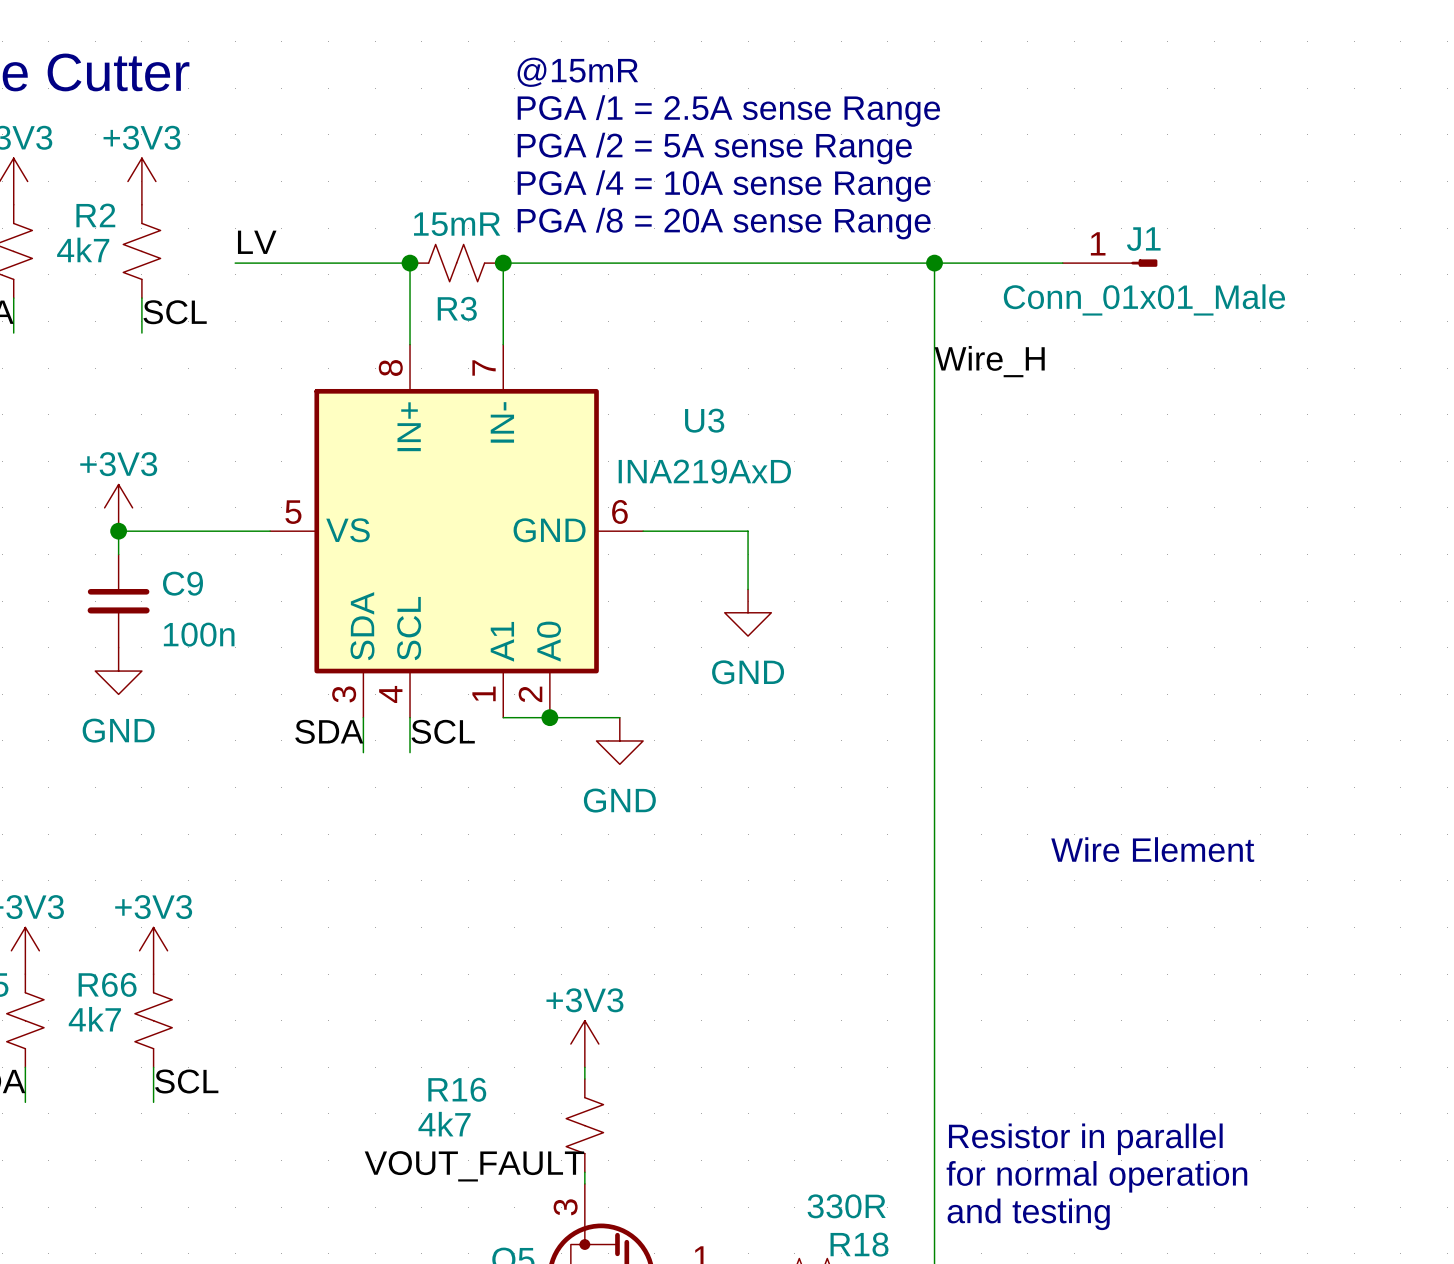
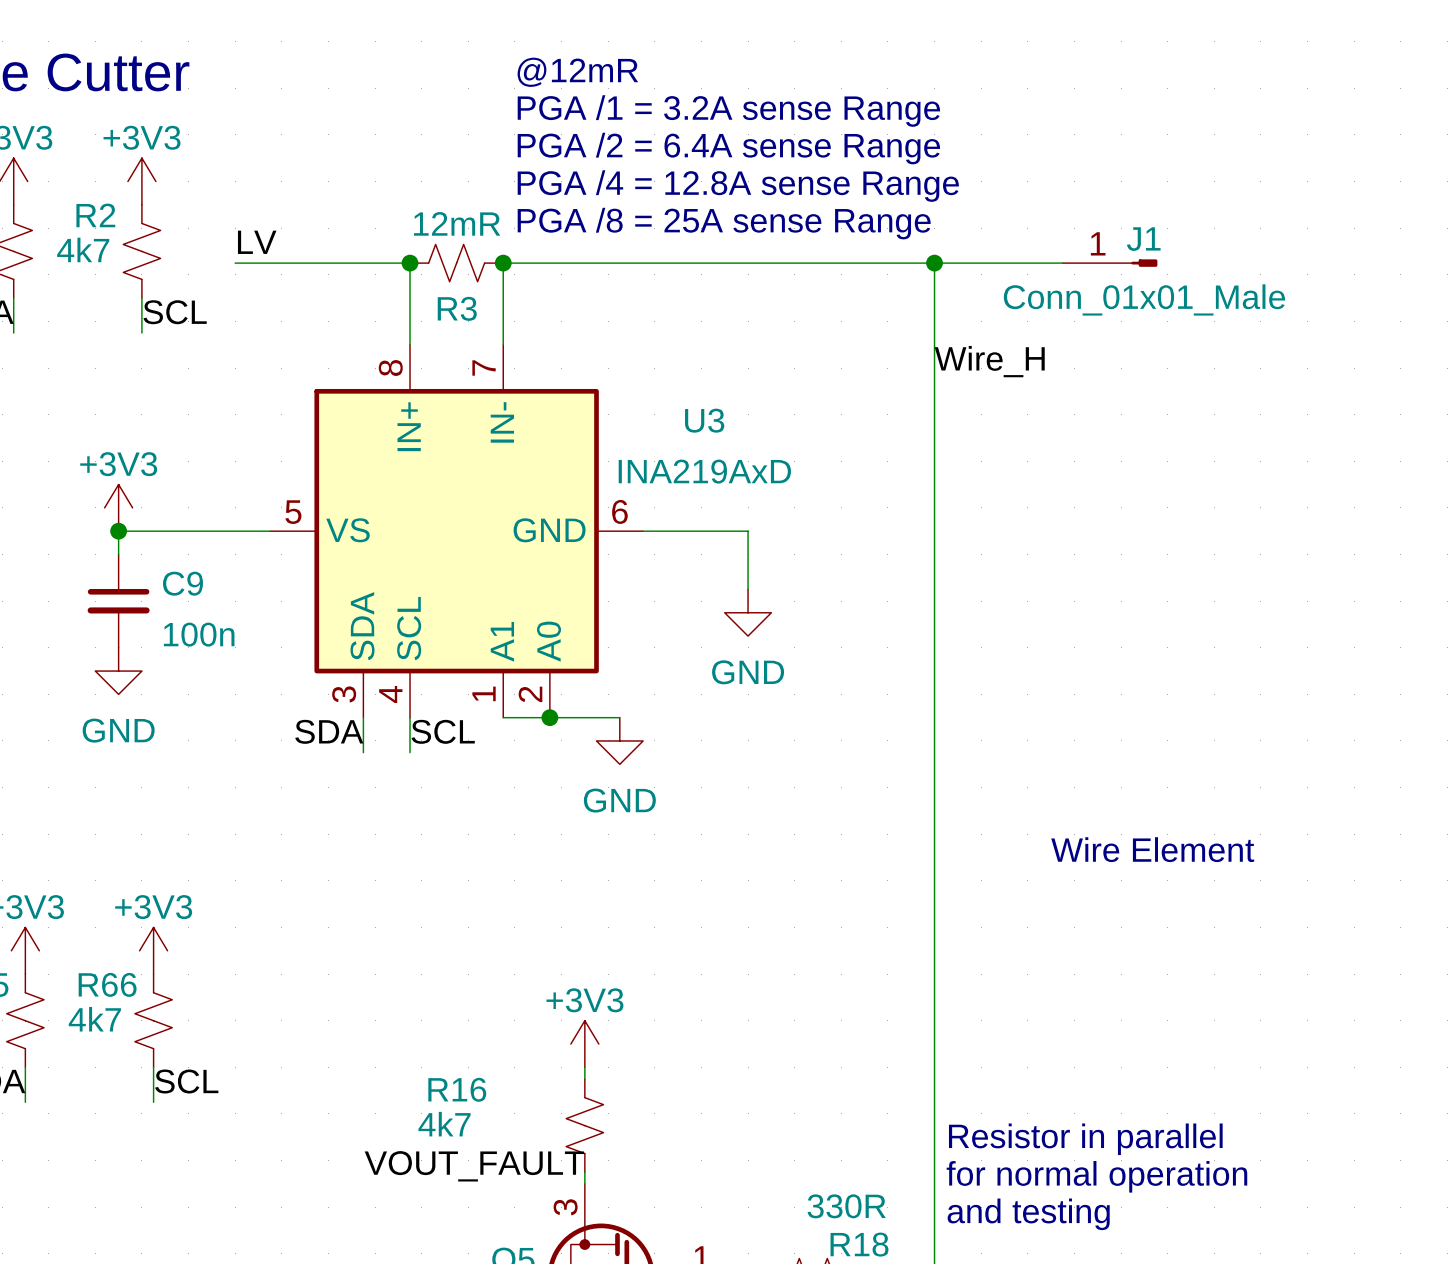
text: @15mR (577, 72) -> @12mR (577, 72)
text: PGA /1 = 2.5A sense Range (728, 110) -> PGA /1 = 3.2A sense Range (728, 110)
text: PGA /2 = 5A sense Range (714, 148) -> PGA /2 = 6.4A sense Range (728, 148)
text: PGA /4 = 10A sense Range (724, 186) -> PGA /4 = 12.8A sense Range (738, 186)
text: PGA /8 = 20A sense Range (724, 223) -> PGA /8 = 25A sense Range (724, 223)
R3 value: 15mR (457, 224) -> 12mR (457, 223)

